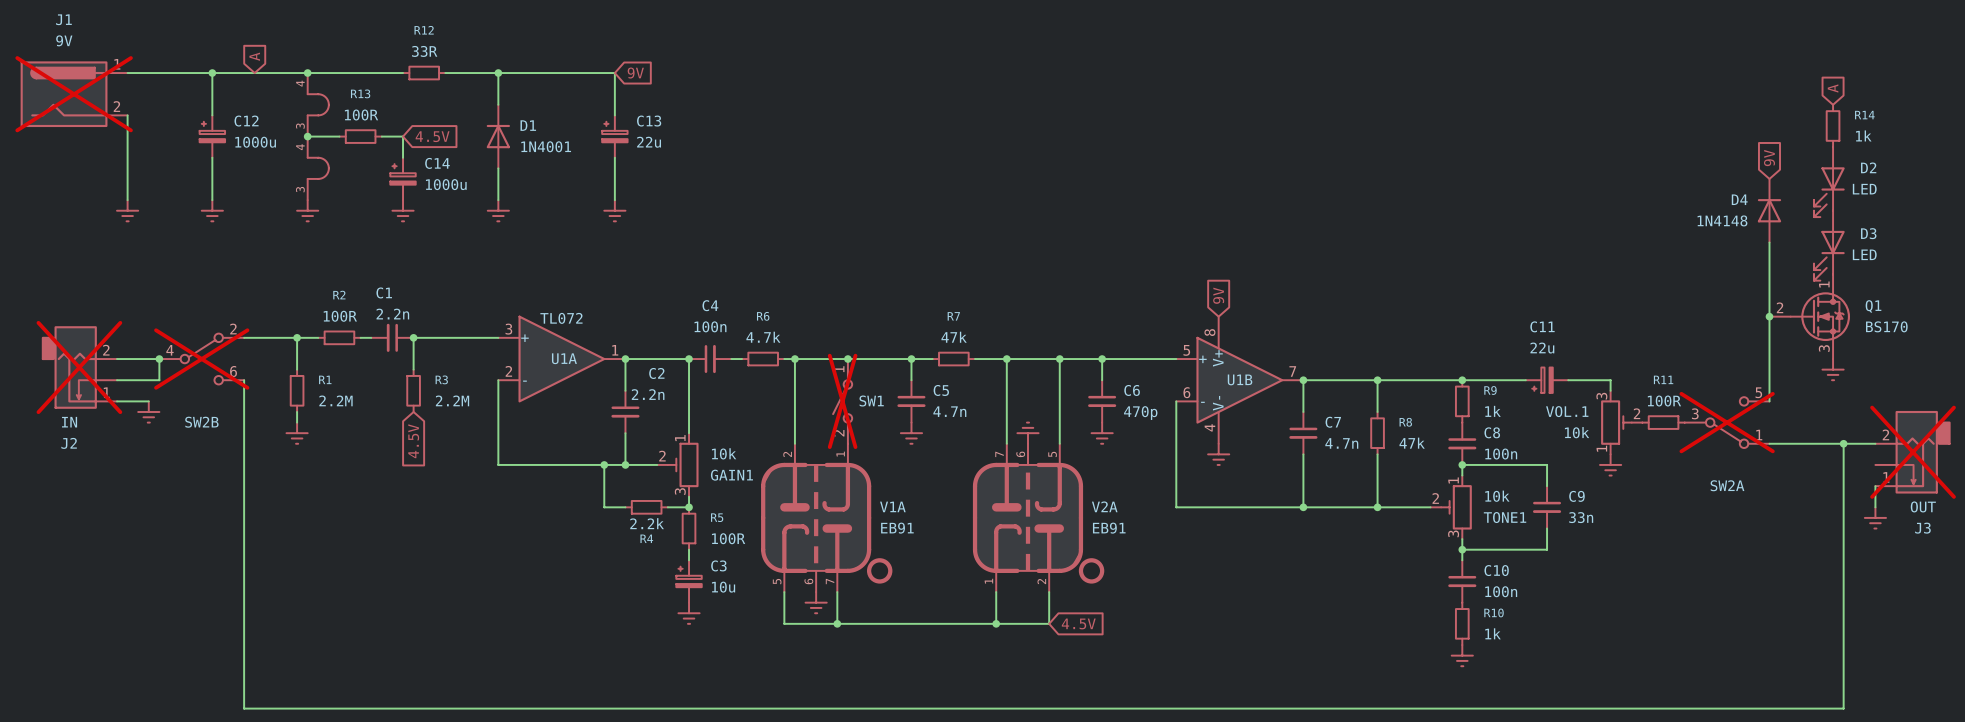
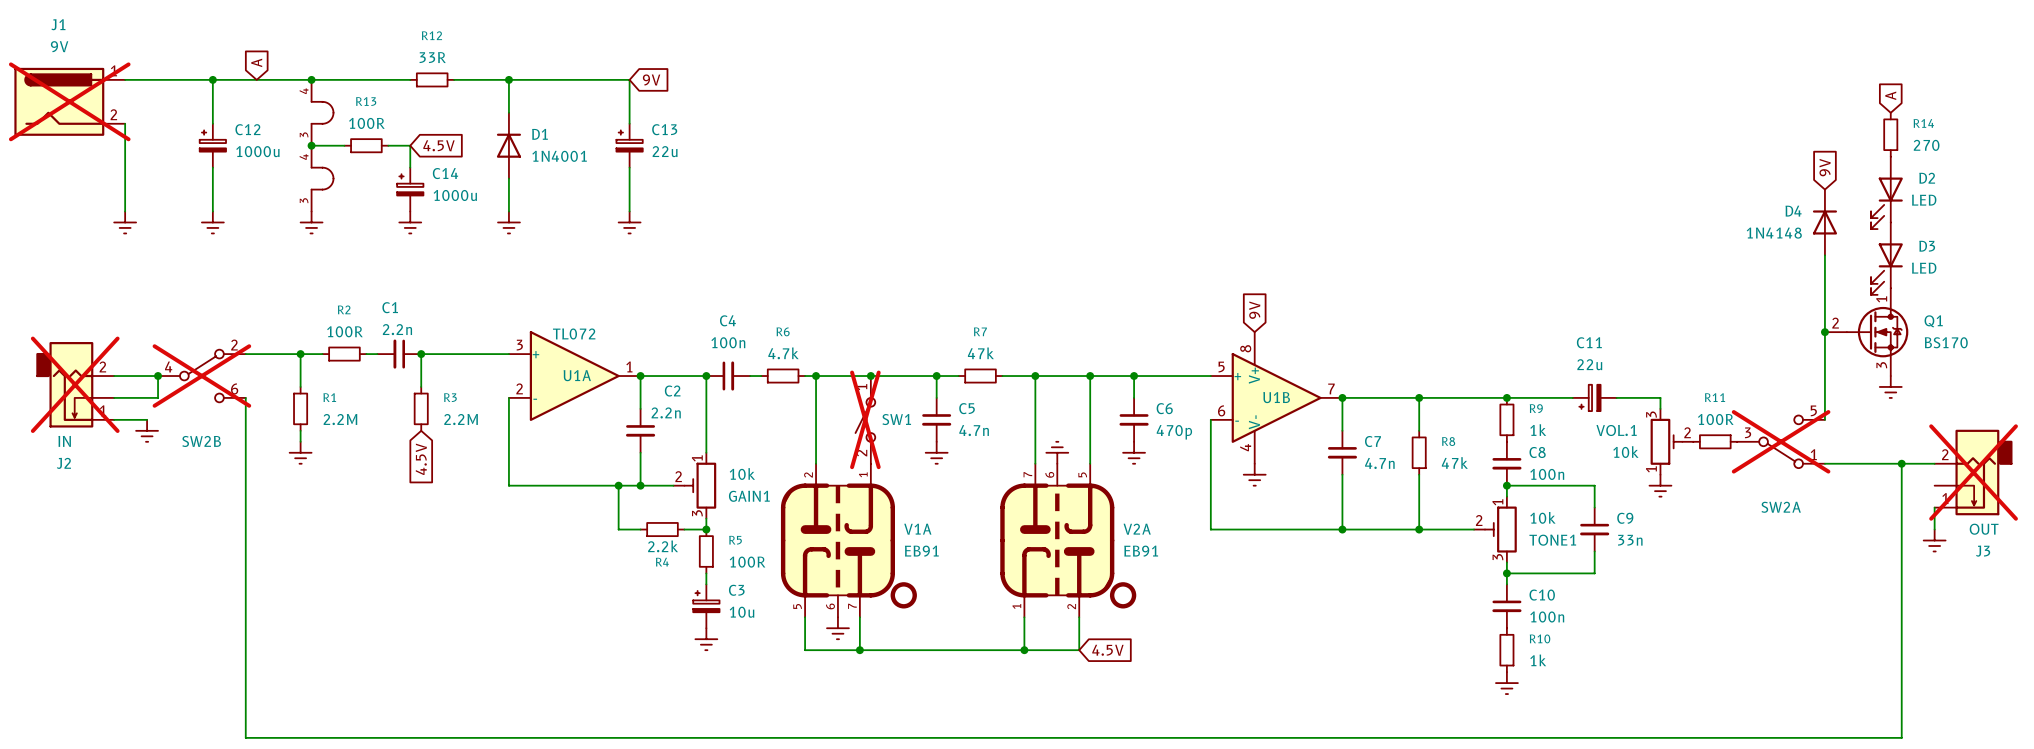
R14 value: 1k (1863, 135) -> 270 (1926, 145)

